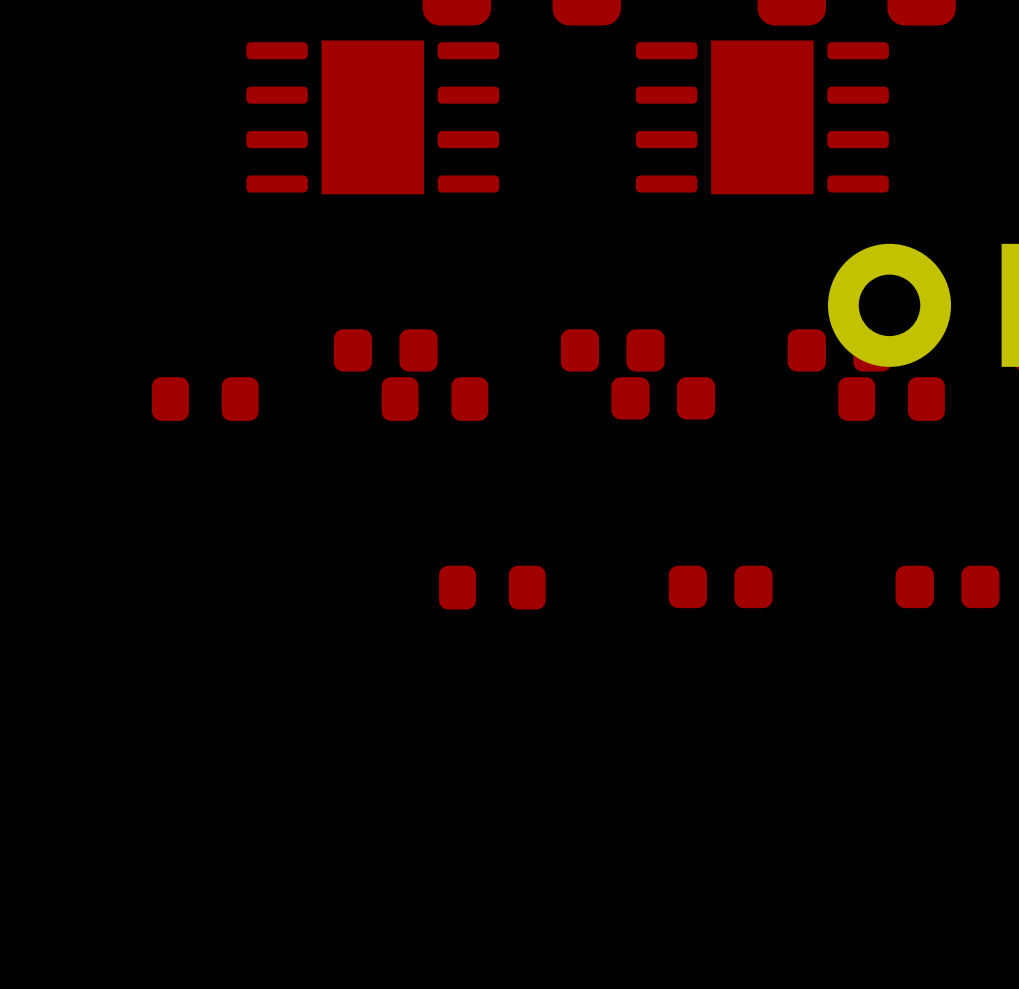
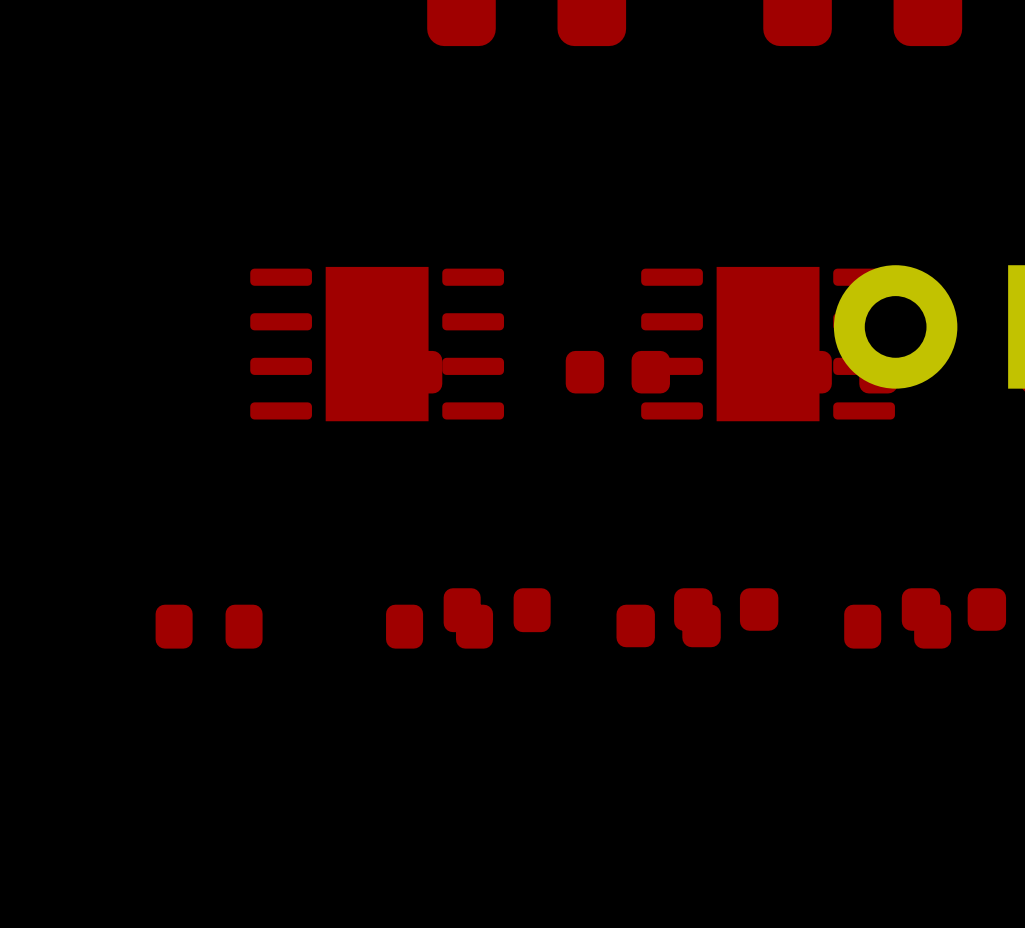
part position: (372, 117) -> (377, 344)
part position: (762, 117) -> (768, 344)
part: (205, 398) -> none
part: (434, 398) -> none
part position: (663, 398) -> (668, 625)
part: (891, 398) -> none
part: none -> (209, 626)
part: none -> (439, 626)
part: none -> (897, 626)

